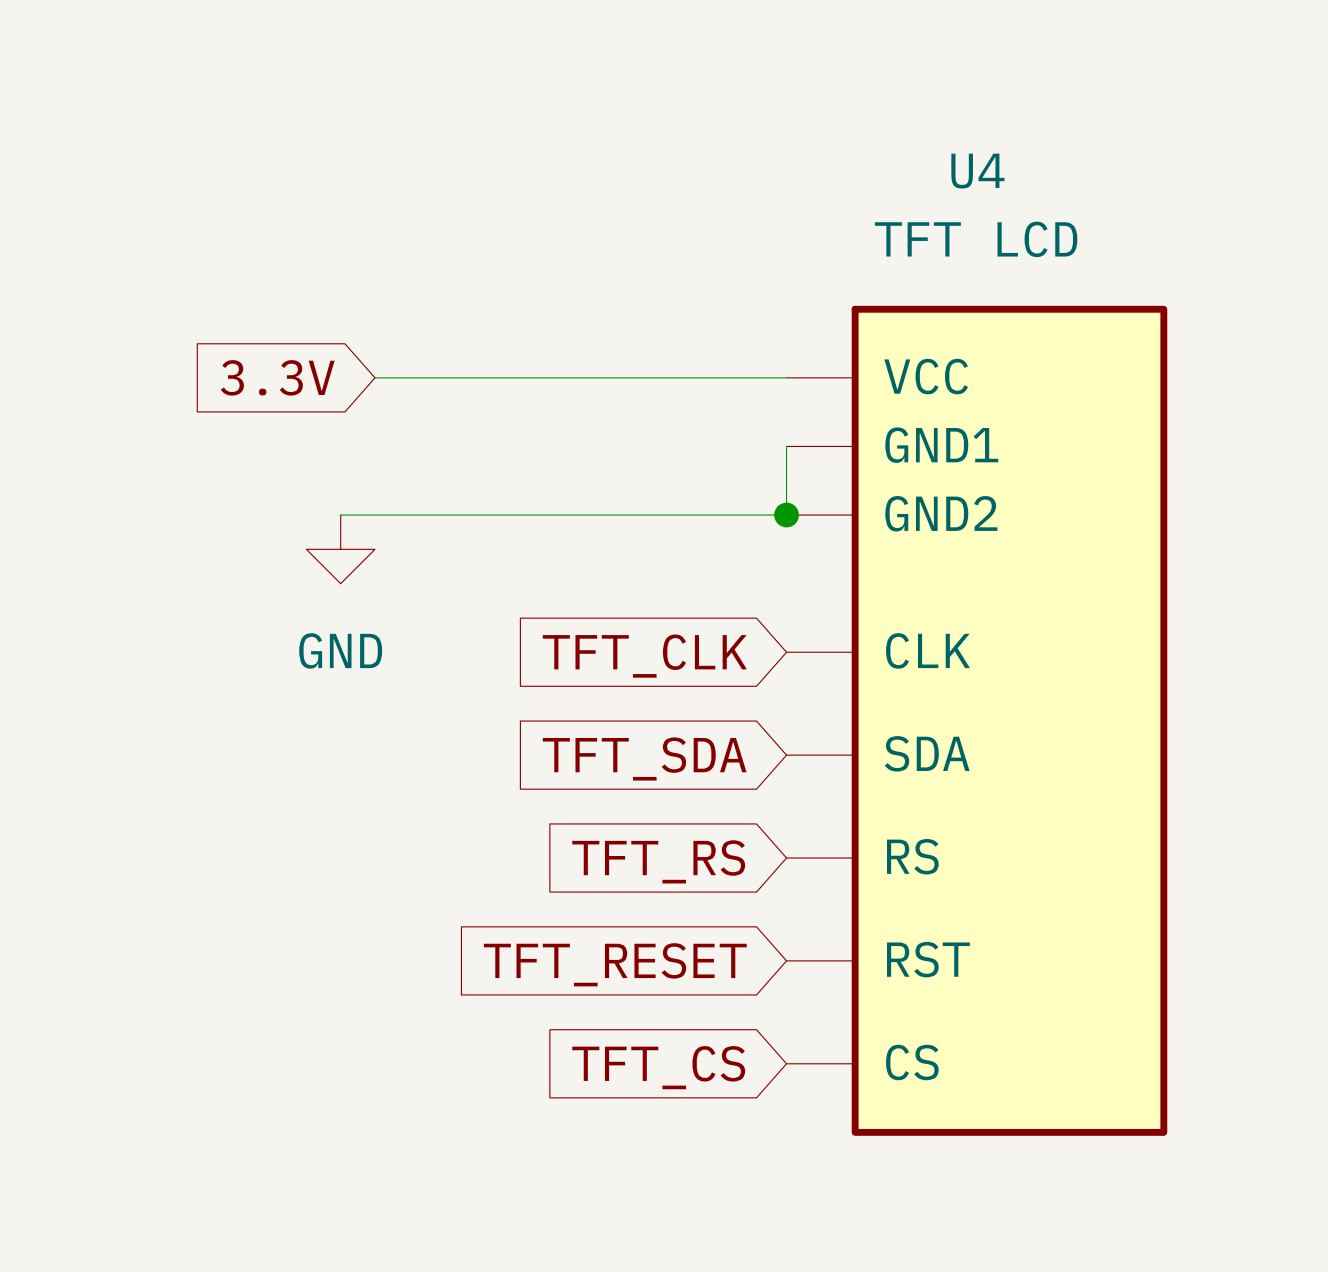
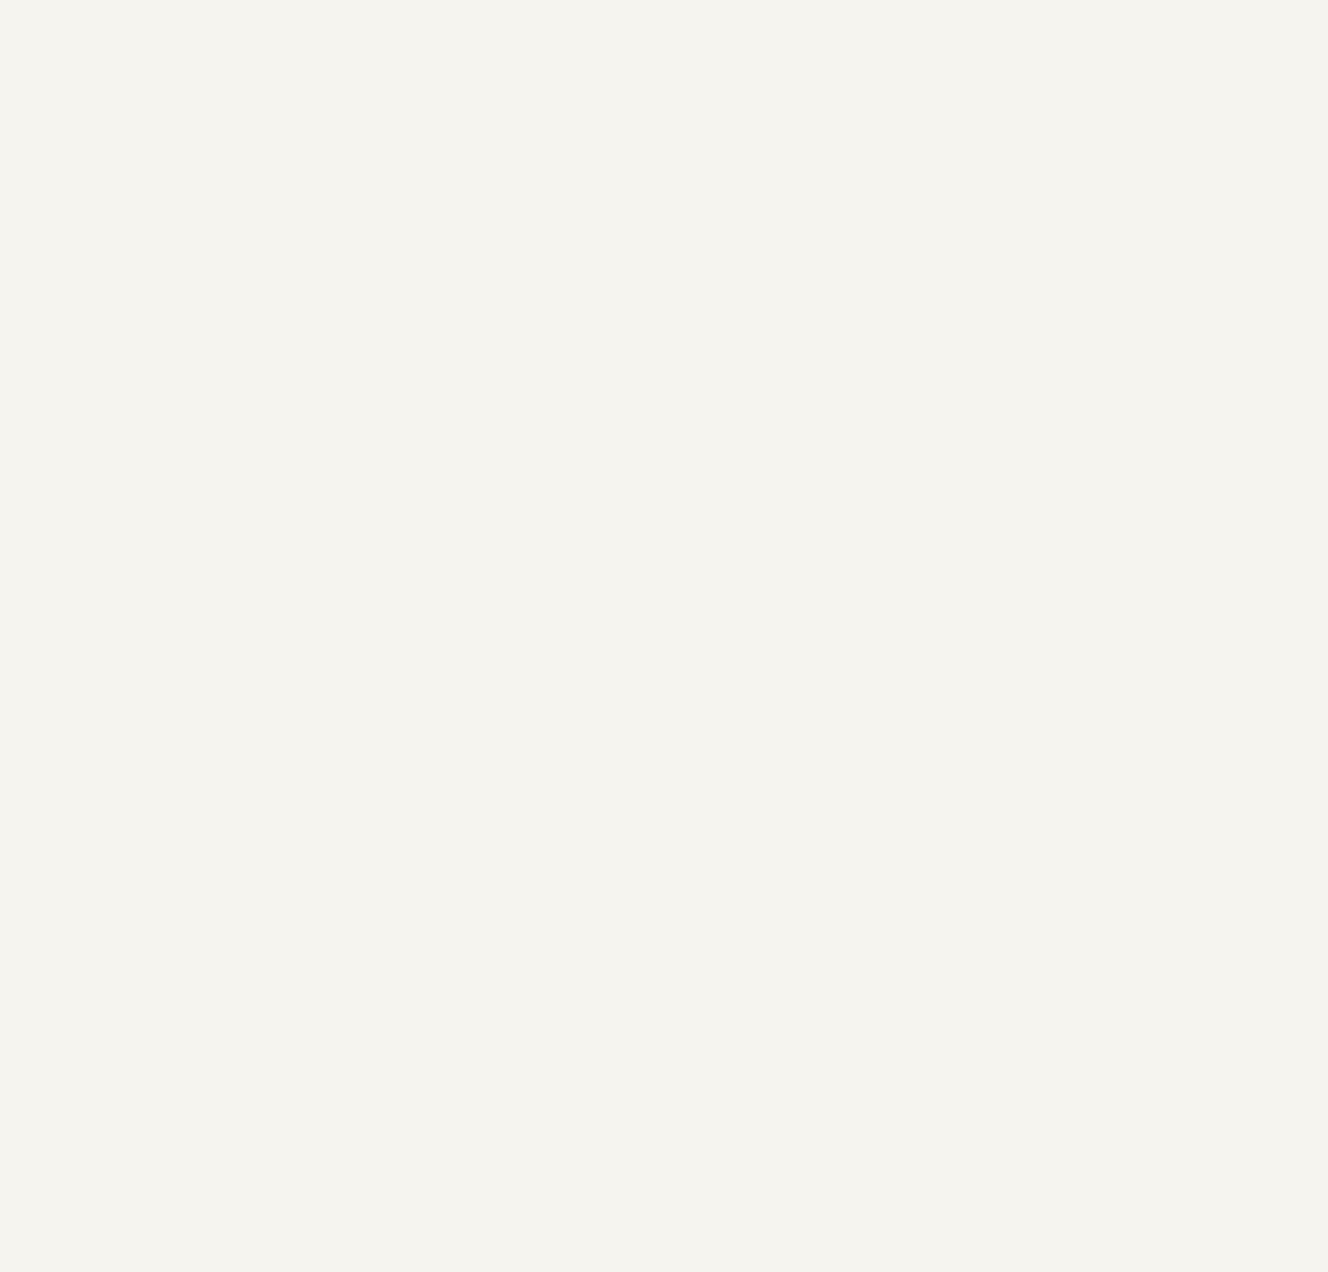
global label: 3.3V (277, 377) -> none
wire: (374, 377) (786, 377) -> none
wire: (786, 446) (786, 515) (340, 515) -> none
junction: (786, 515) -> none
power symbol: GND (340, 549) -> none
global label: TFT_CLK (644, 656) -> none
U4: TFT LCD (976, 720) -> none
global label: TFT_SDA (644, 758) -> none
global label: TFT_RS (658, 861) -> none
global label: TFT_RESET (615, 964) -> none
global label: TFT_CS (658, 1067) -> none

